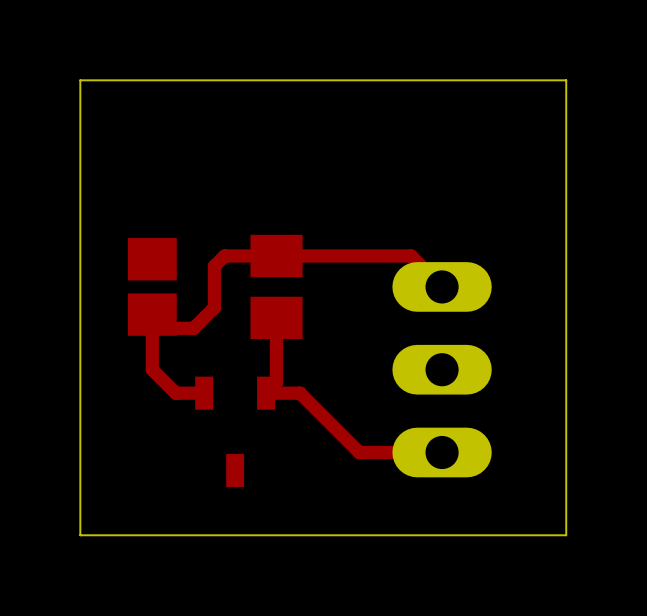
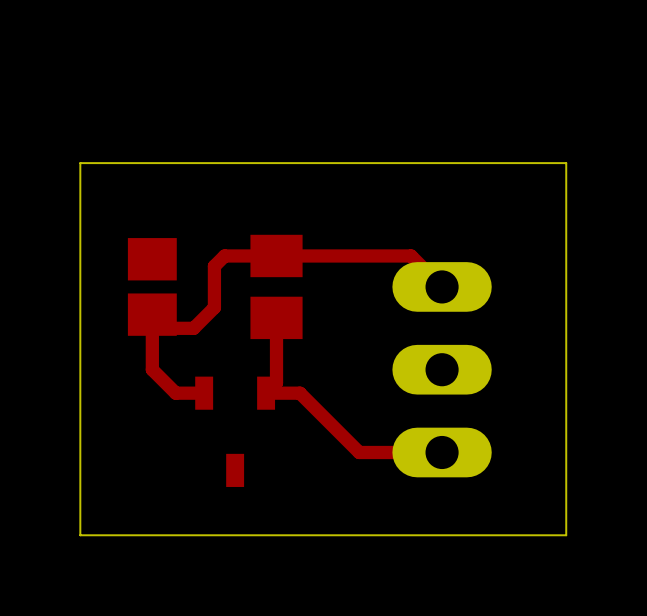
board edge: (566, 163) (566, 80) (80, 80) (80, 163) -> (566, 163) (80, 163)

